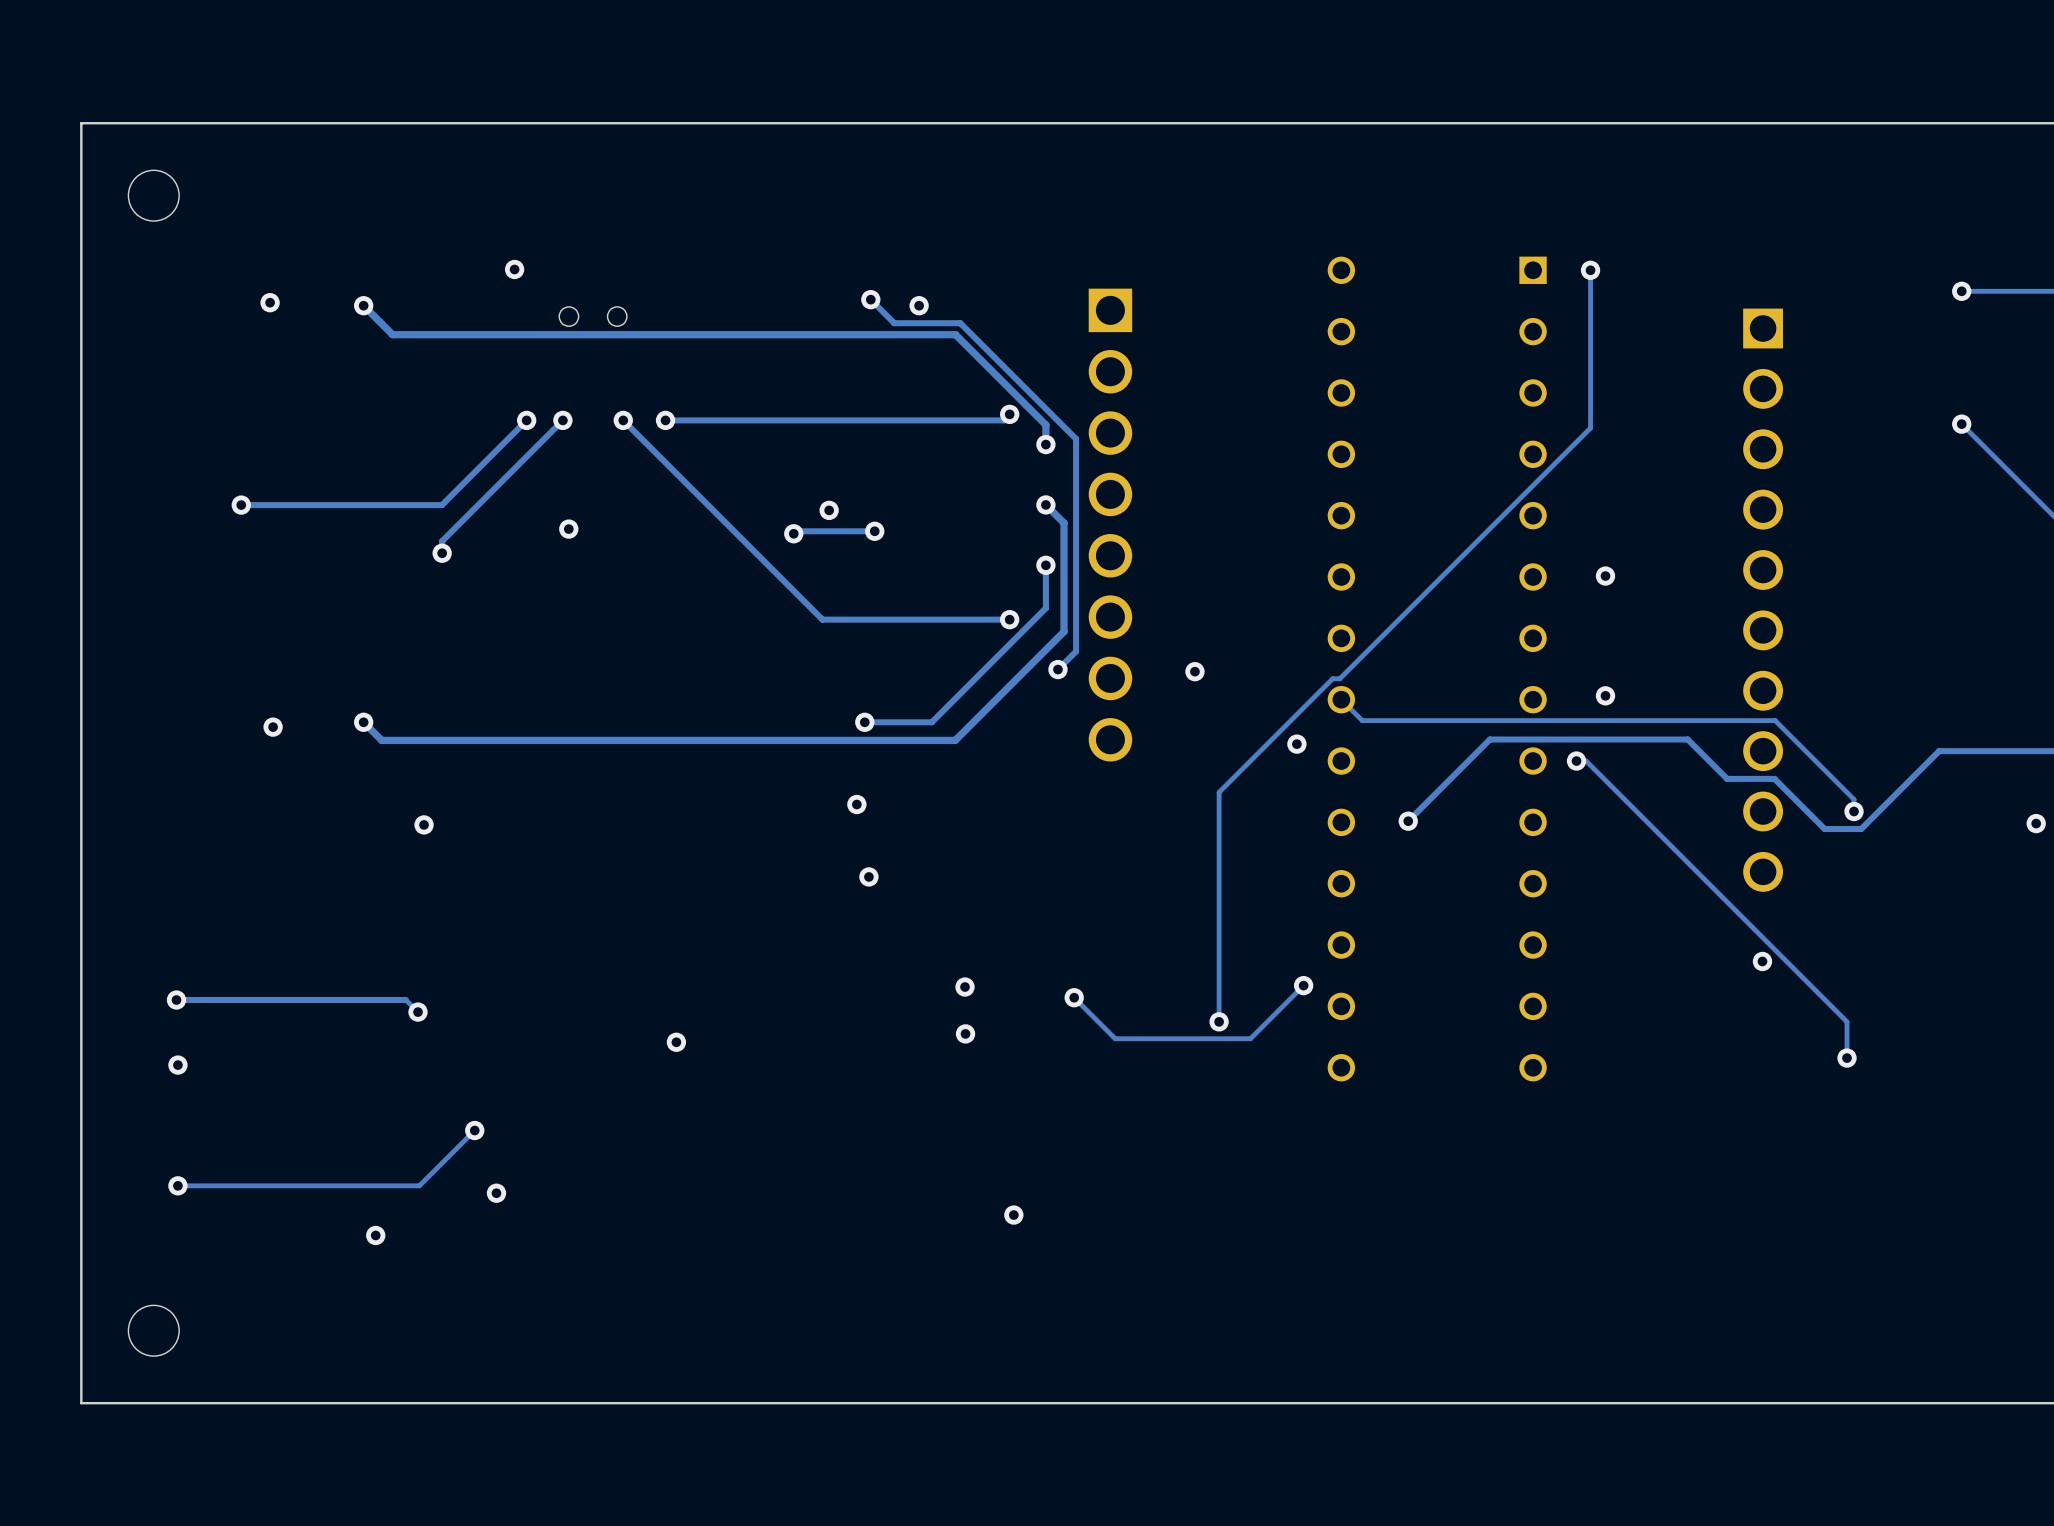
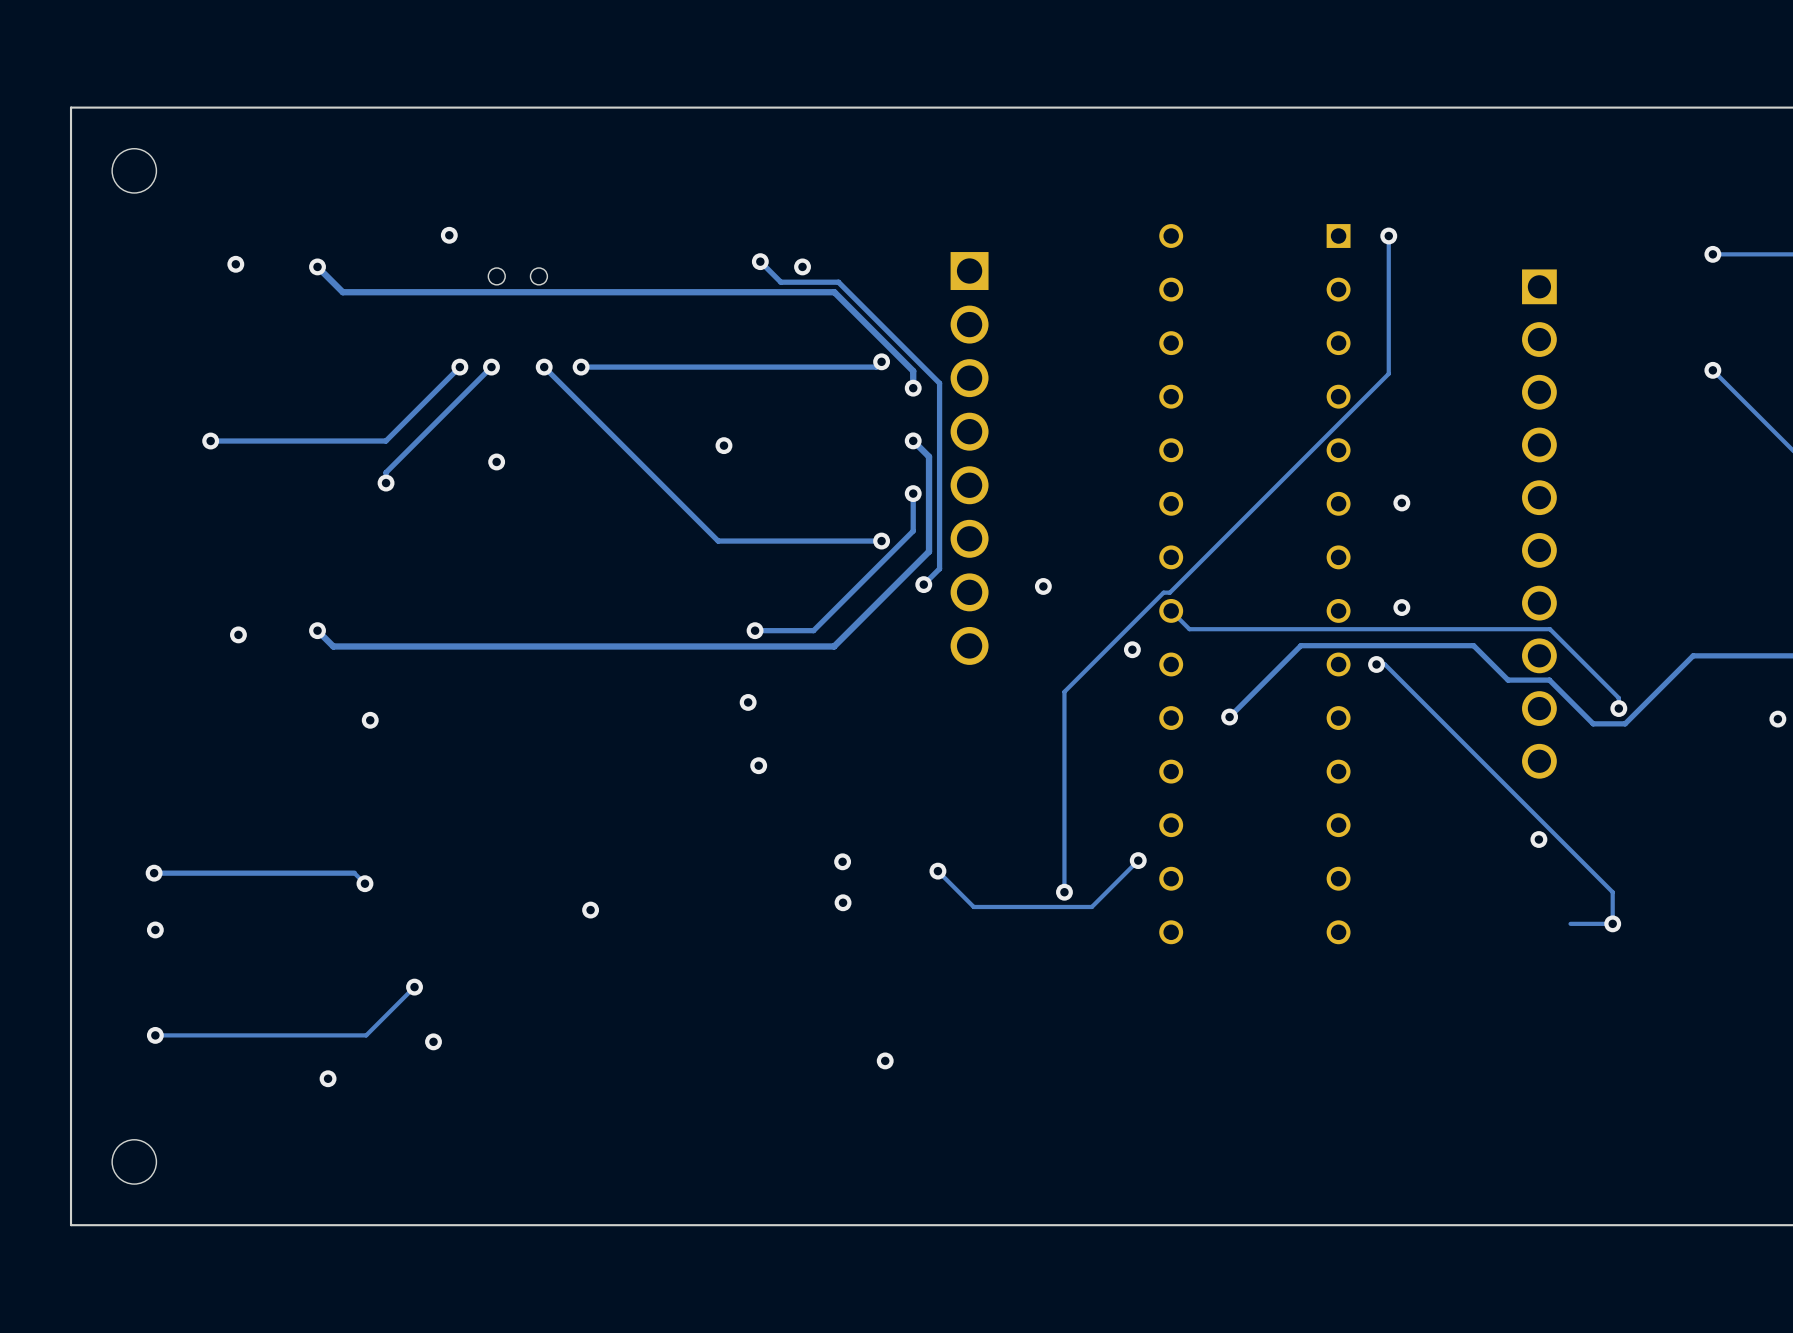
track: (874, 531) (796, 531) (793, 533) -> none
via: (874, 531) -> none
via: (793, 533) -> none
track: none -> (1612, 923) (1570, 923)

